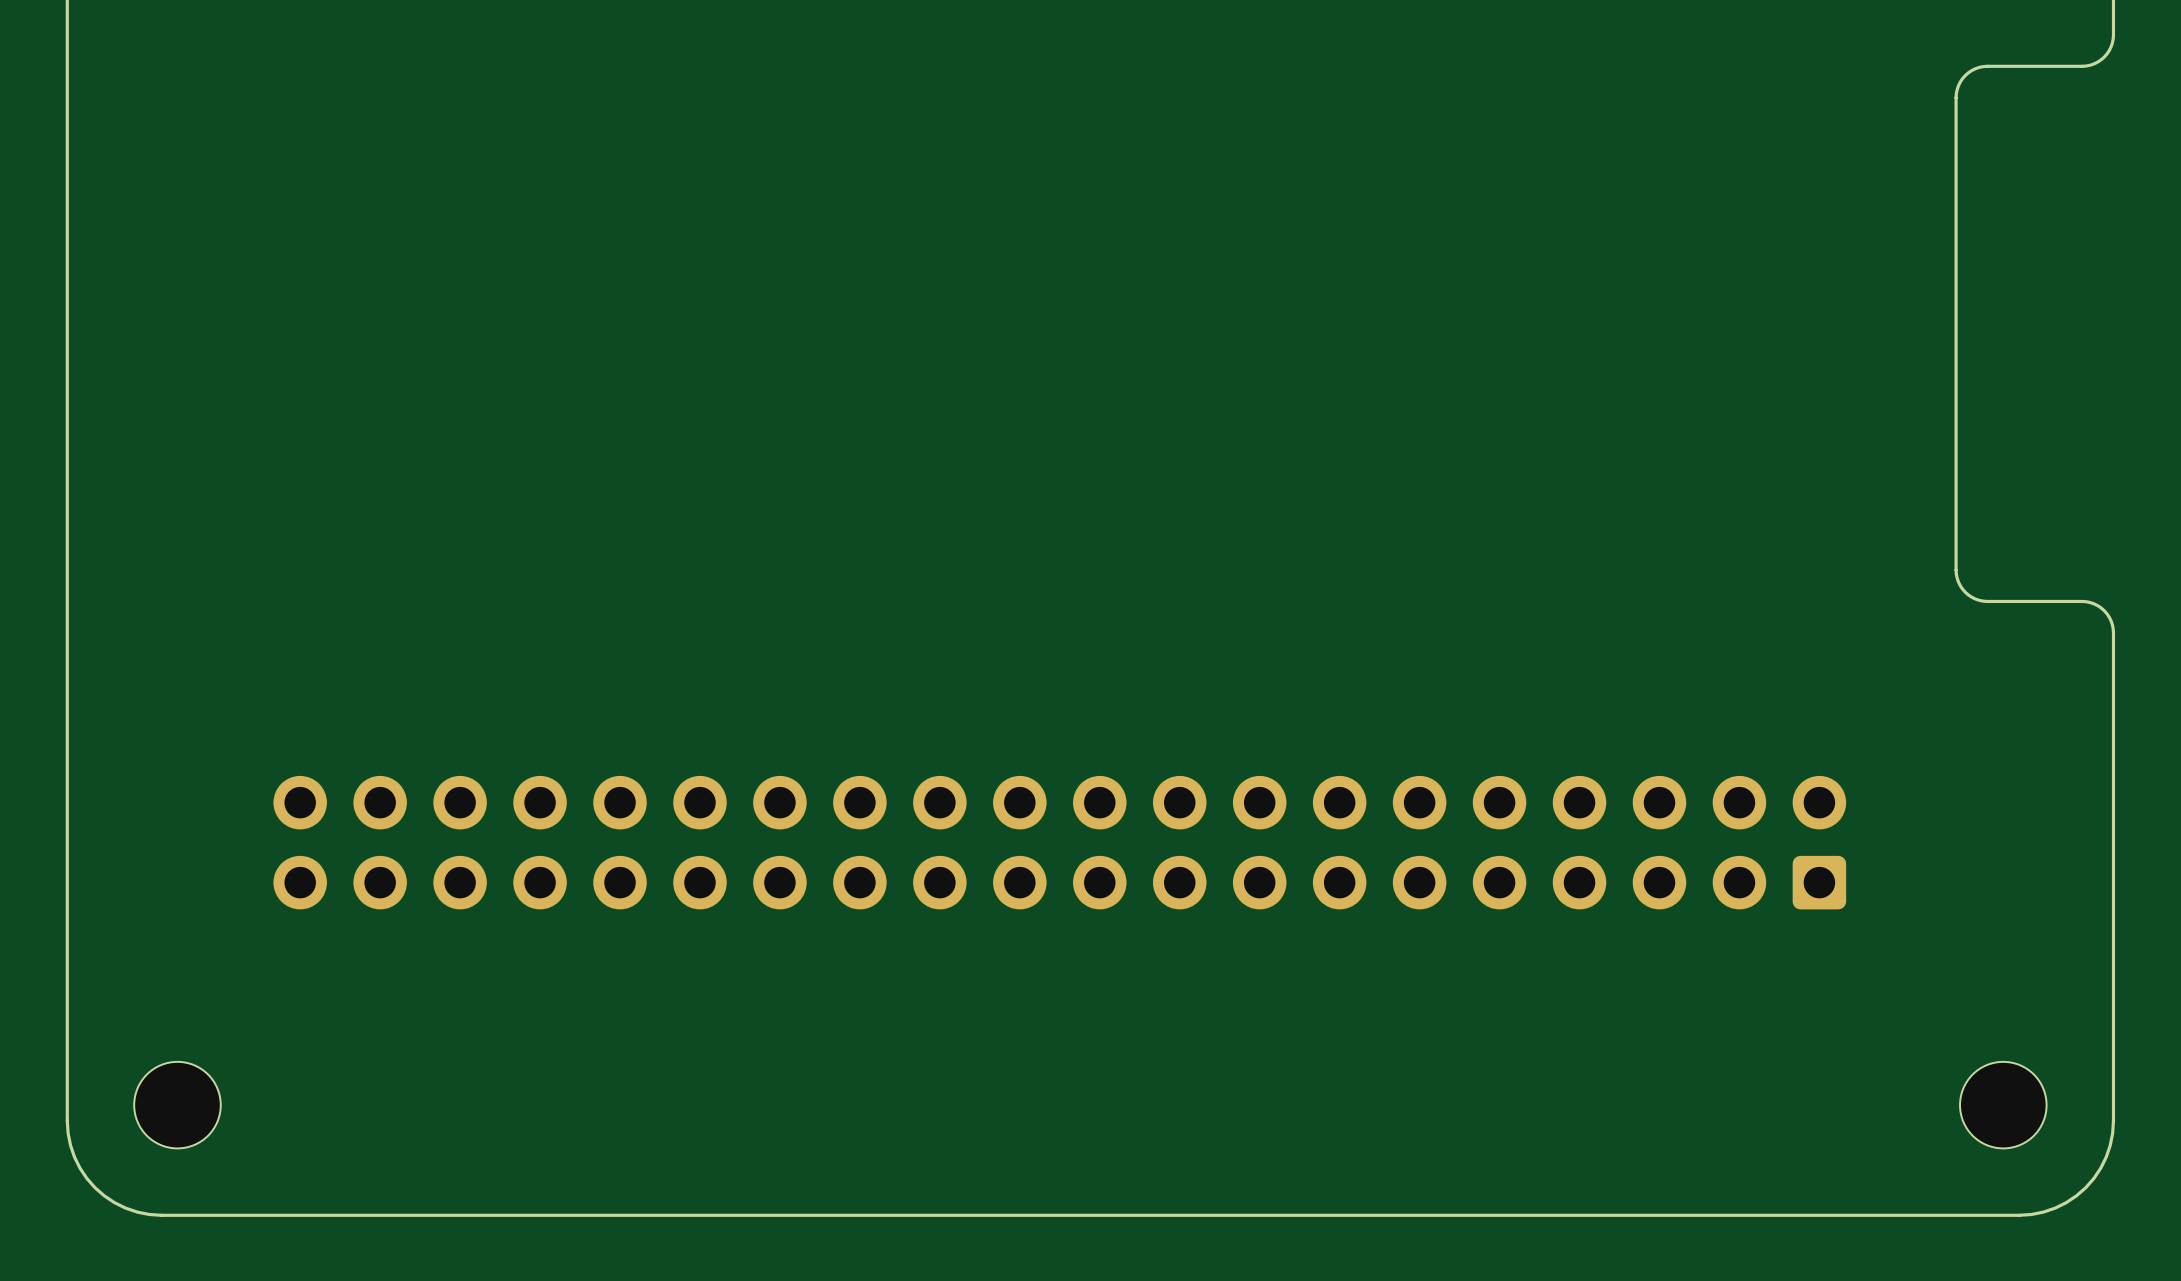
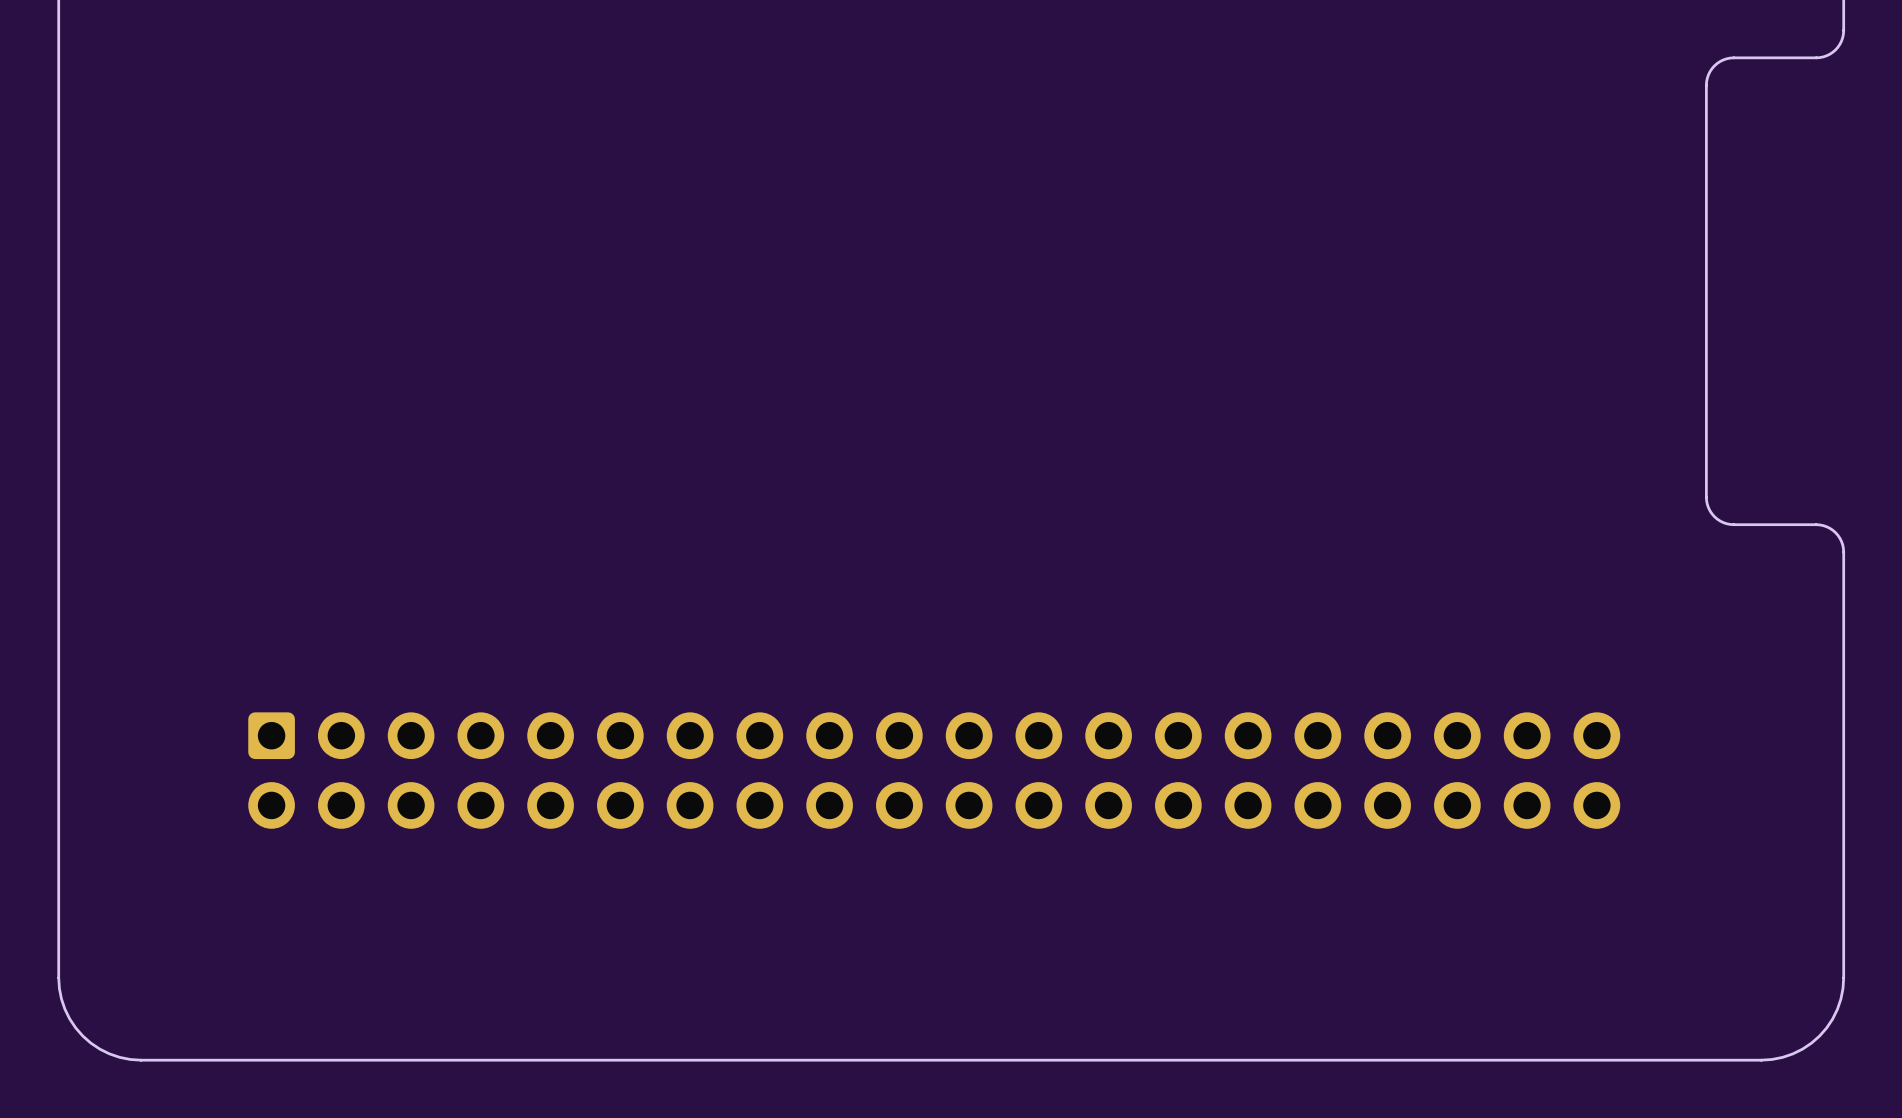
part rotation: 0° (1059, 842) -> 180° (934, 770)
part: (177, 1105) -> none
part: (2003, 1105) -> none

